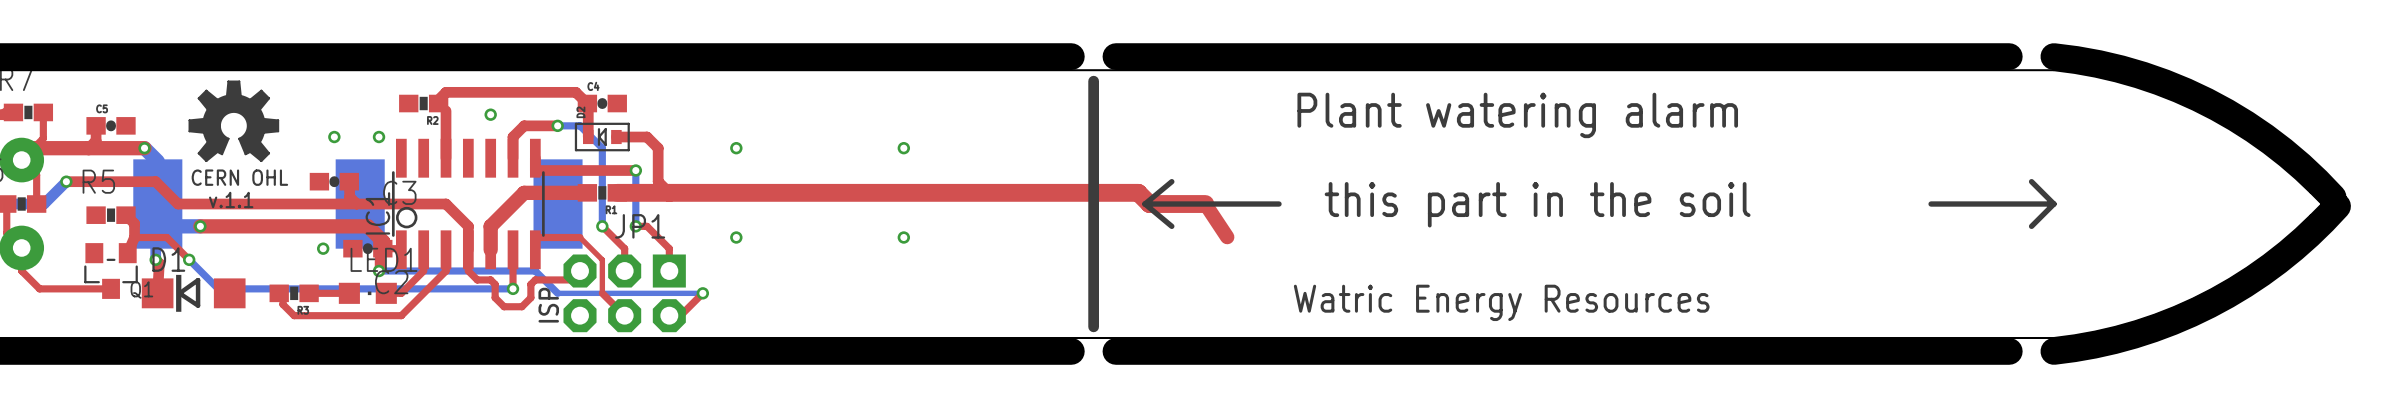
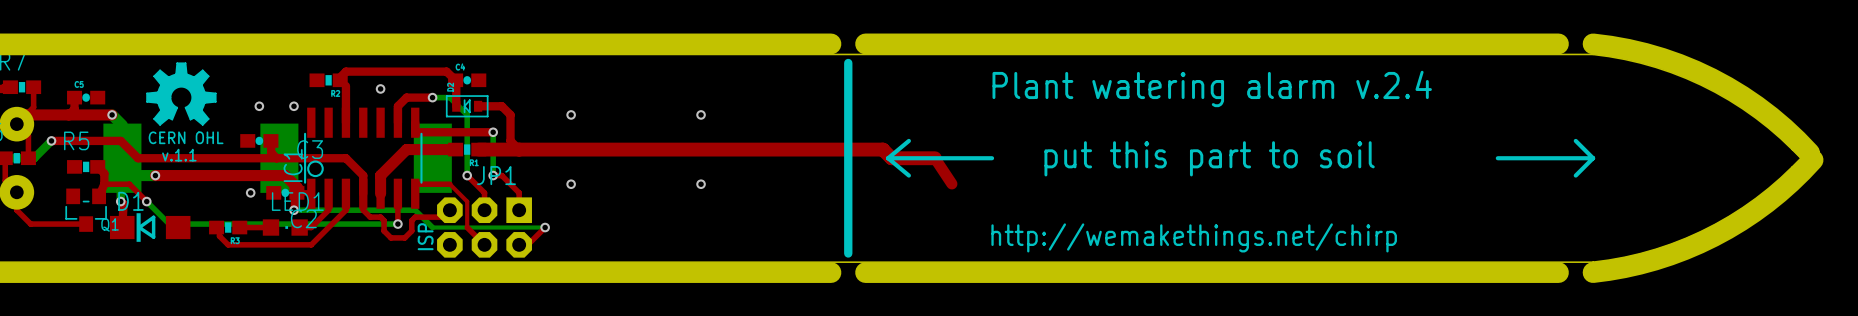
text: Plant watering alarm (1517, 115) -> Plant watering alarm v.2.4 (1212, 88)
text: this part in the soil (1537, 204) -> put this part to soil (1209, 158)
text: Watric Energy Resources (1501, 302) -> none
text: none -> http://wemakethings.net/chirp (1194, 237)

